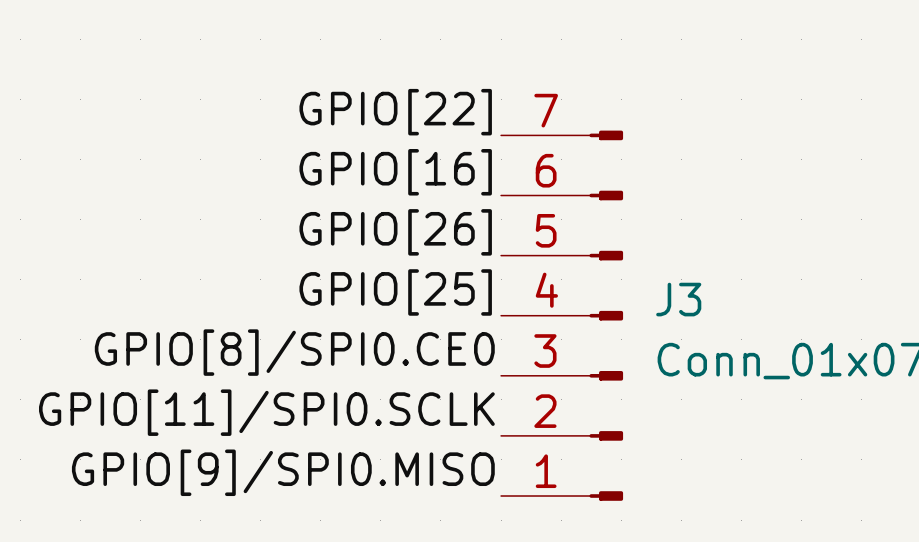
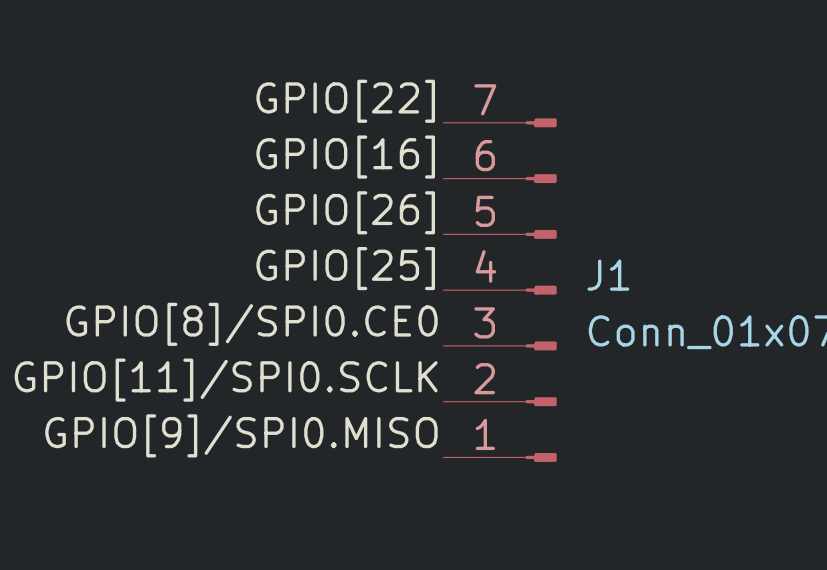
J3 name: J3 (678, 299) -> J1 (608, 275)

